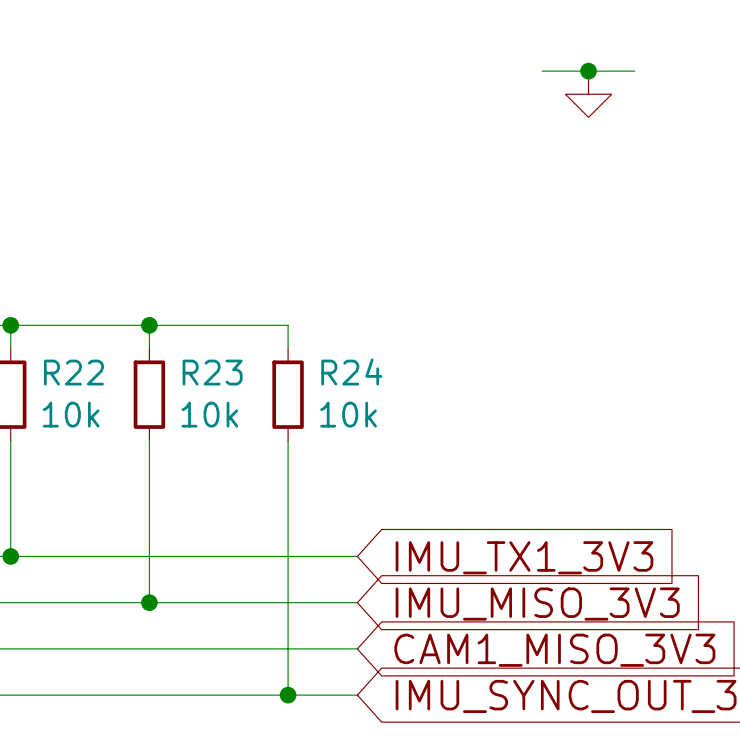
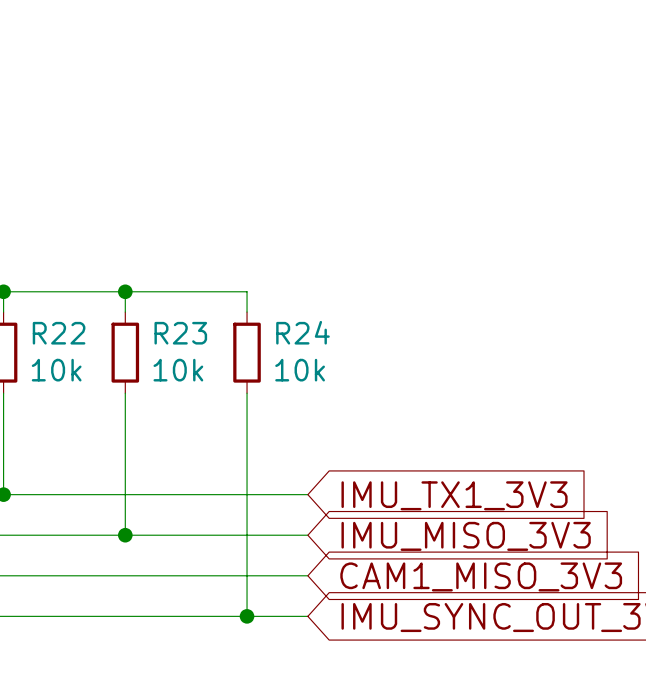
wire: (542, 71) (634, 71) -> none
junction: (588, 71) -> none
power symbol: (588, 94) -> none

